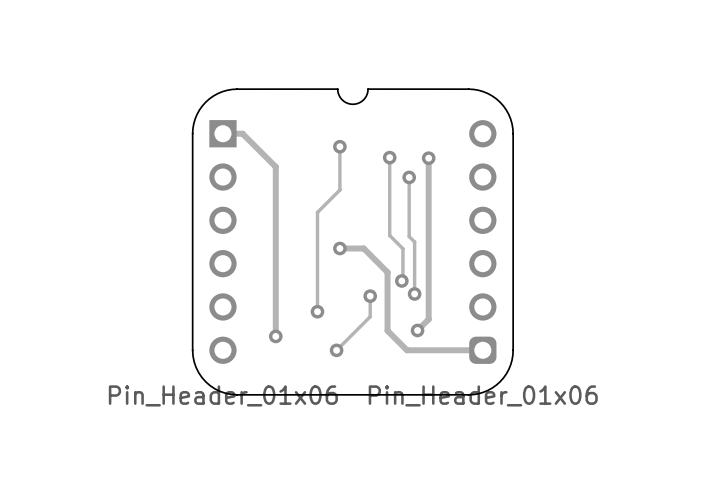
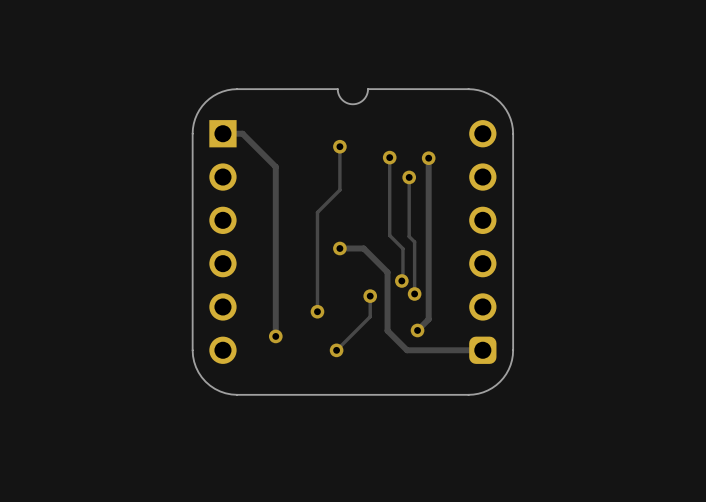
drawing: [108, 385, 598, 407] -> none

